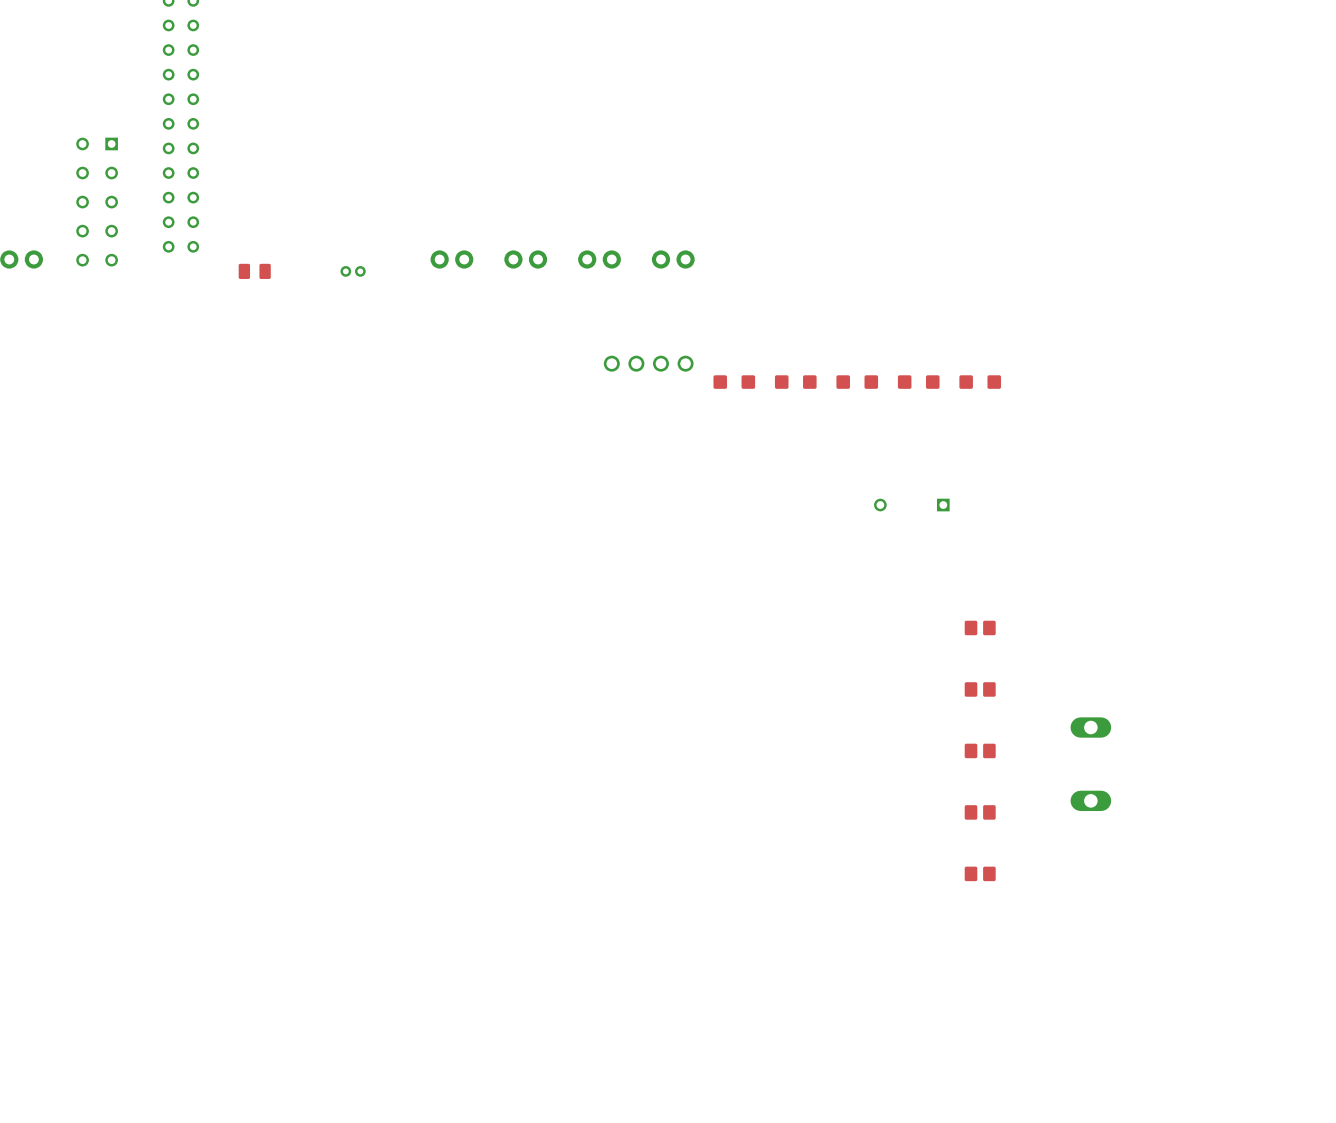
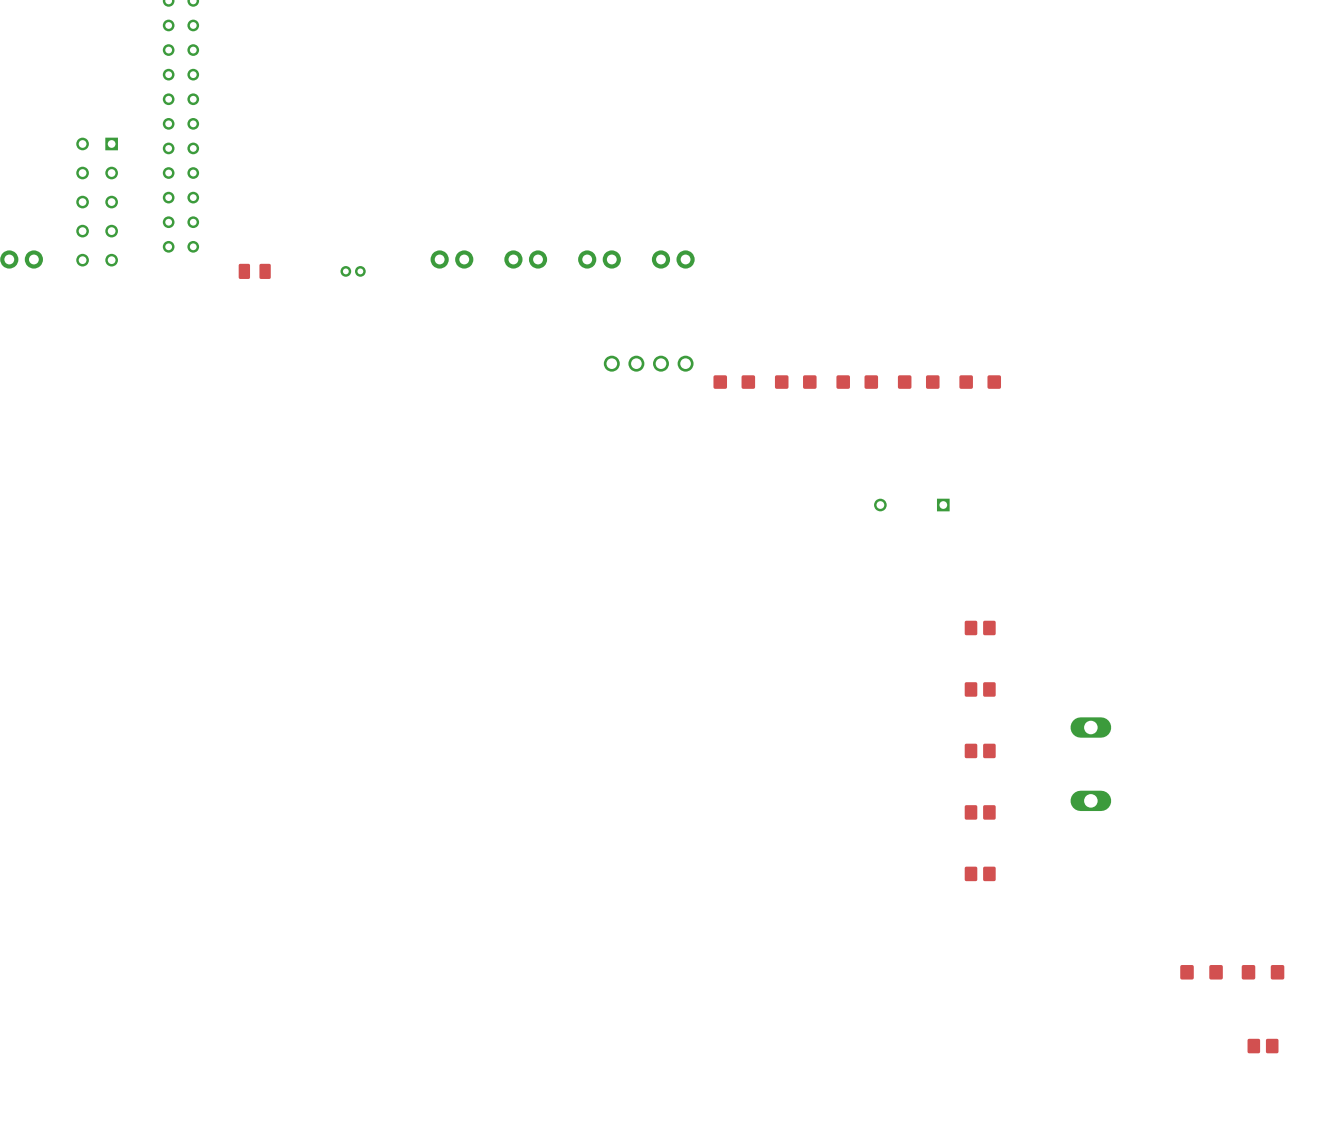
part: none -> (1201, 972)
part: none -> (1263, 972)
part: none -> (1263, 1046)

